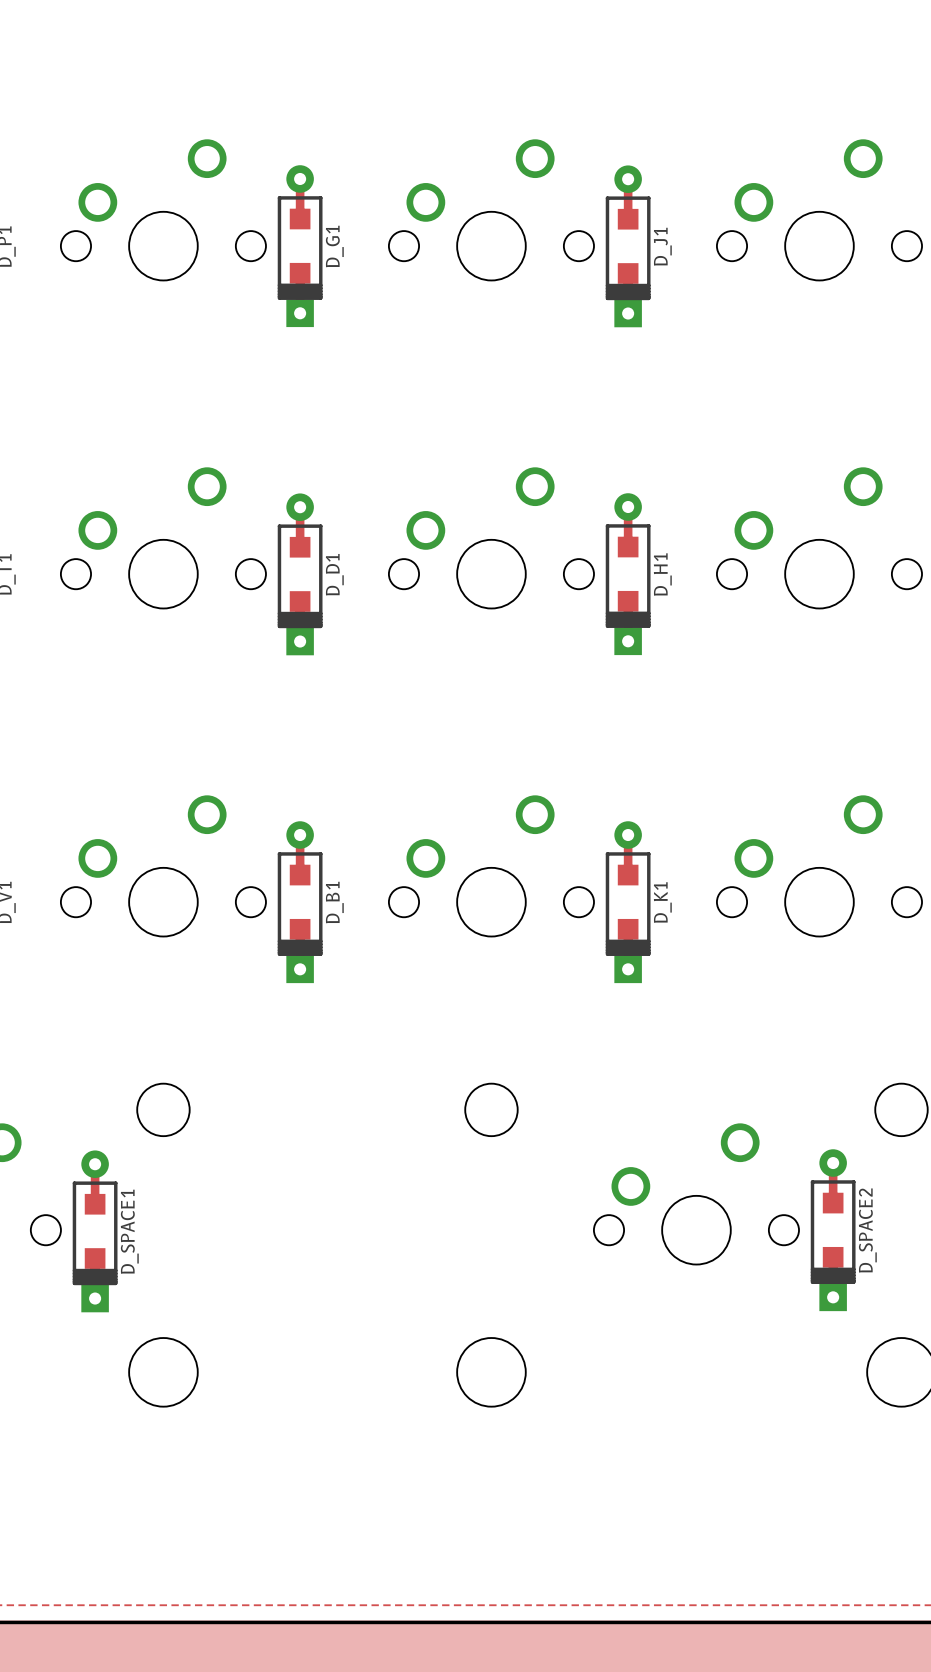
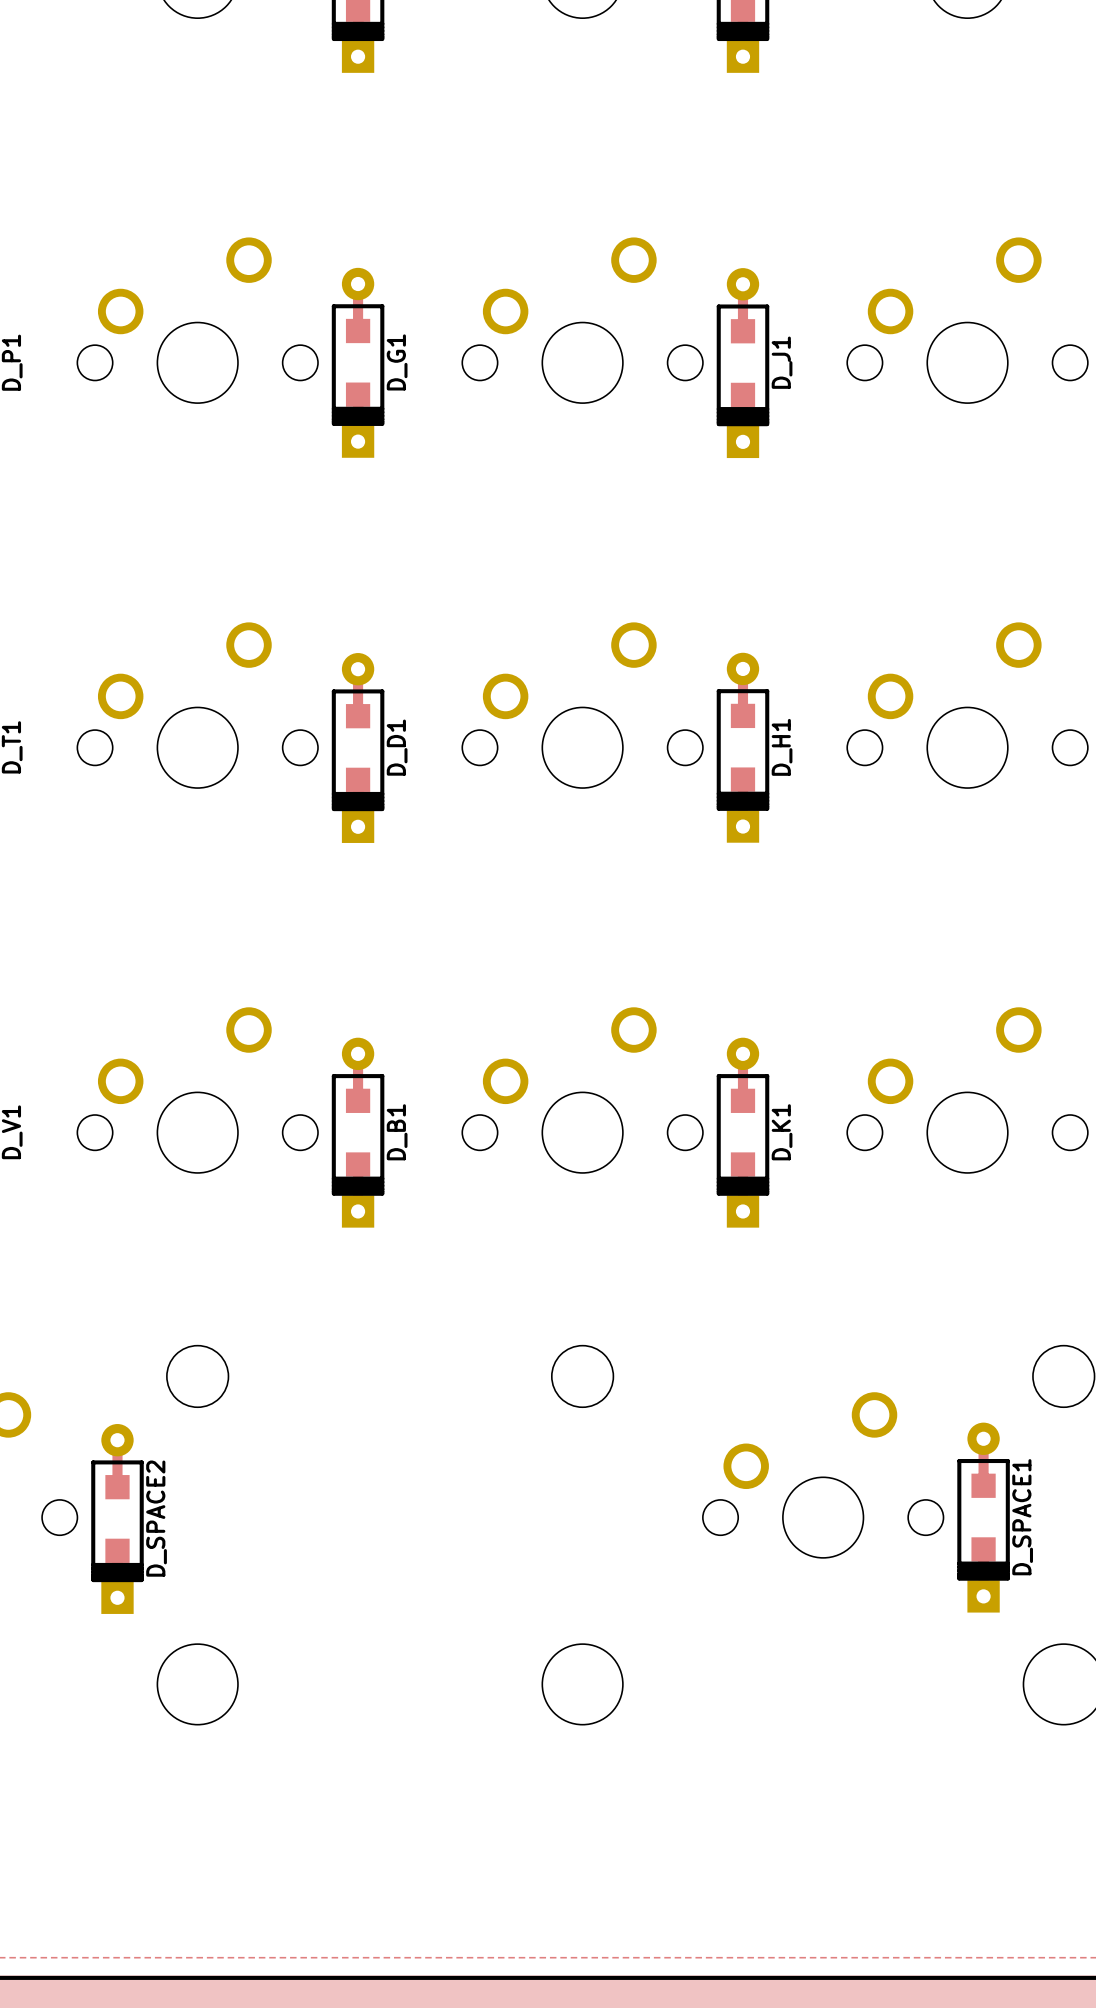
D_SPACE2 name: D_SPACE2 (867, 1230) -> D_SPACE1 (1022, 1517)
D_SPACE1 name: D_SPACE1 (129, 1231) -> D_SPACE2 (156, 1518)

